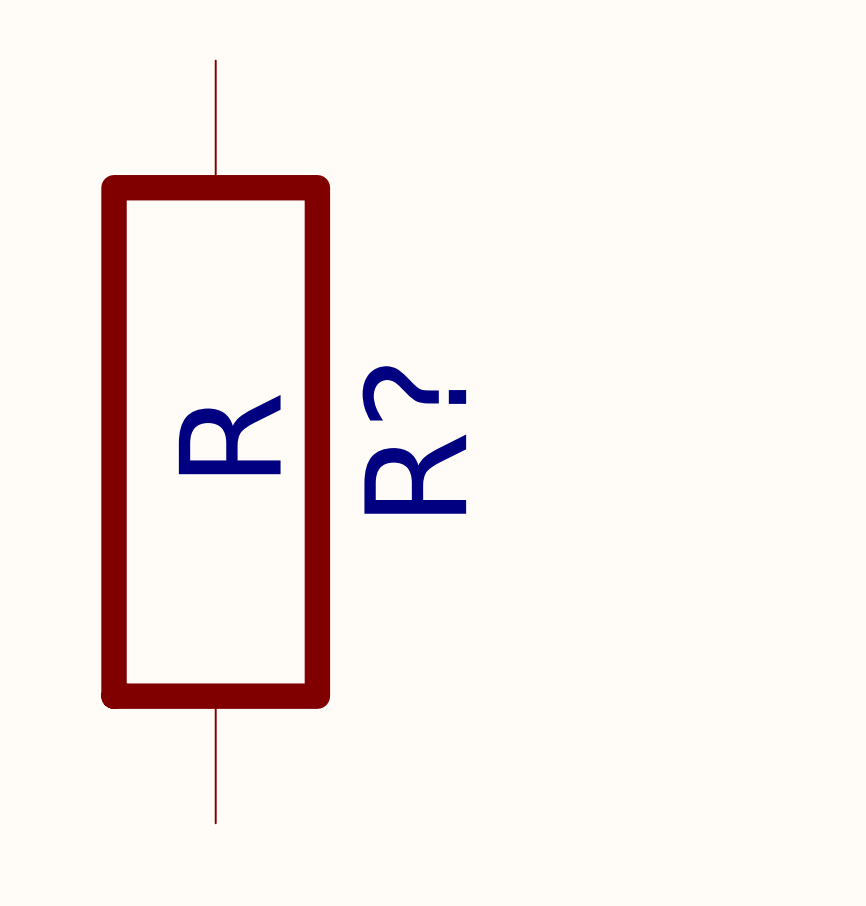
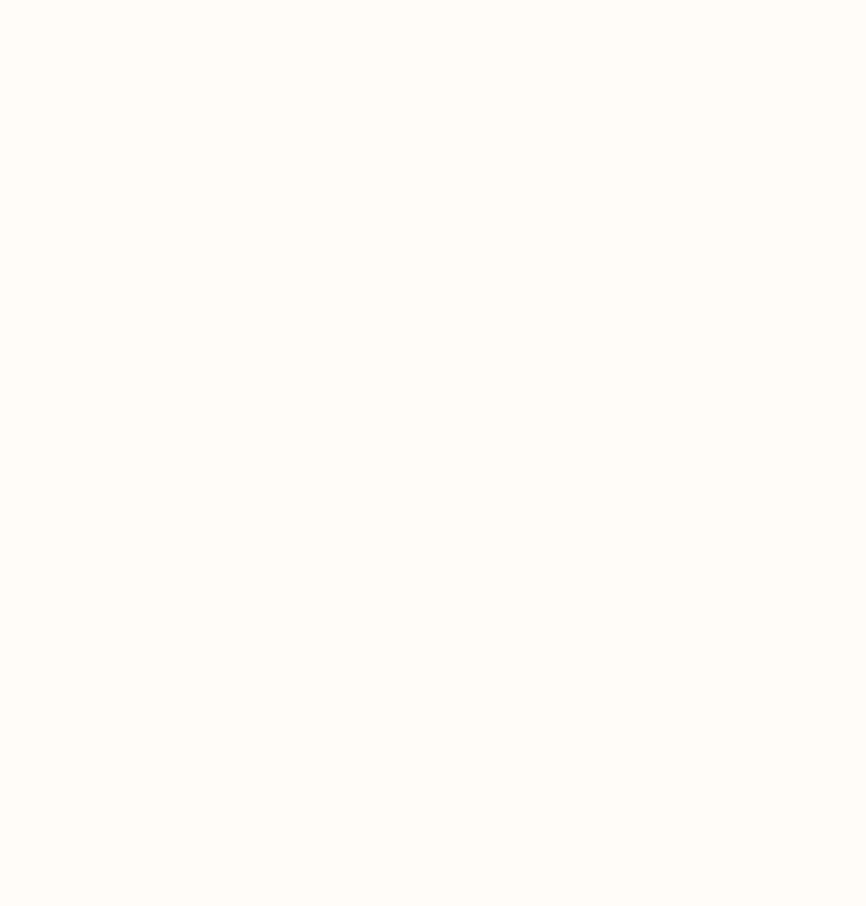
R?: R (215, 441) -> none

